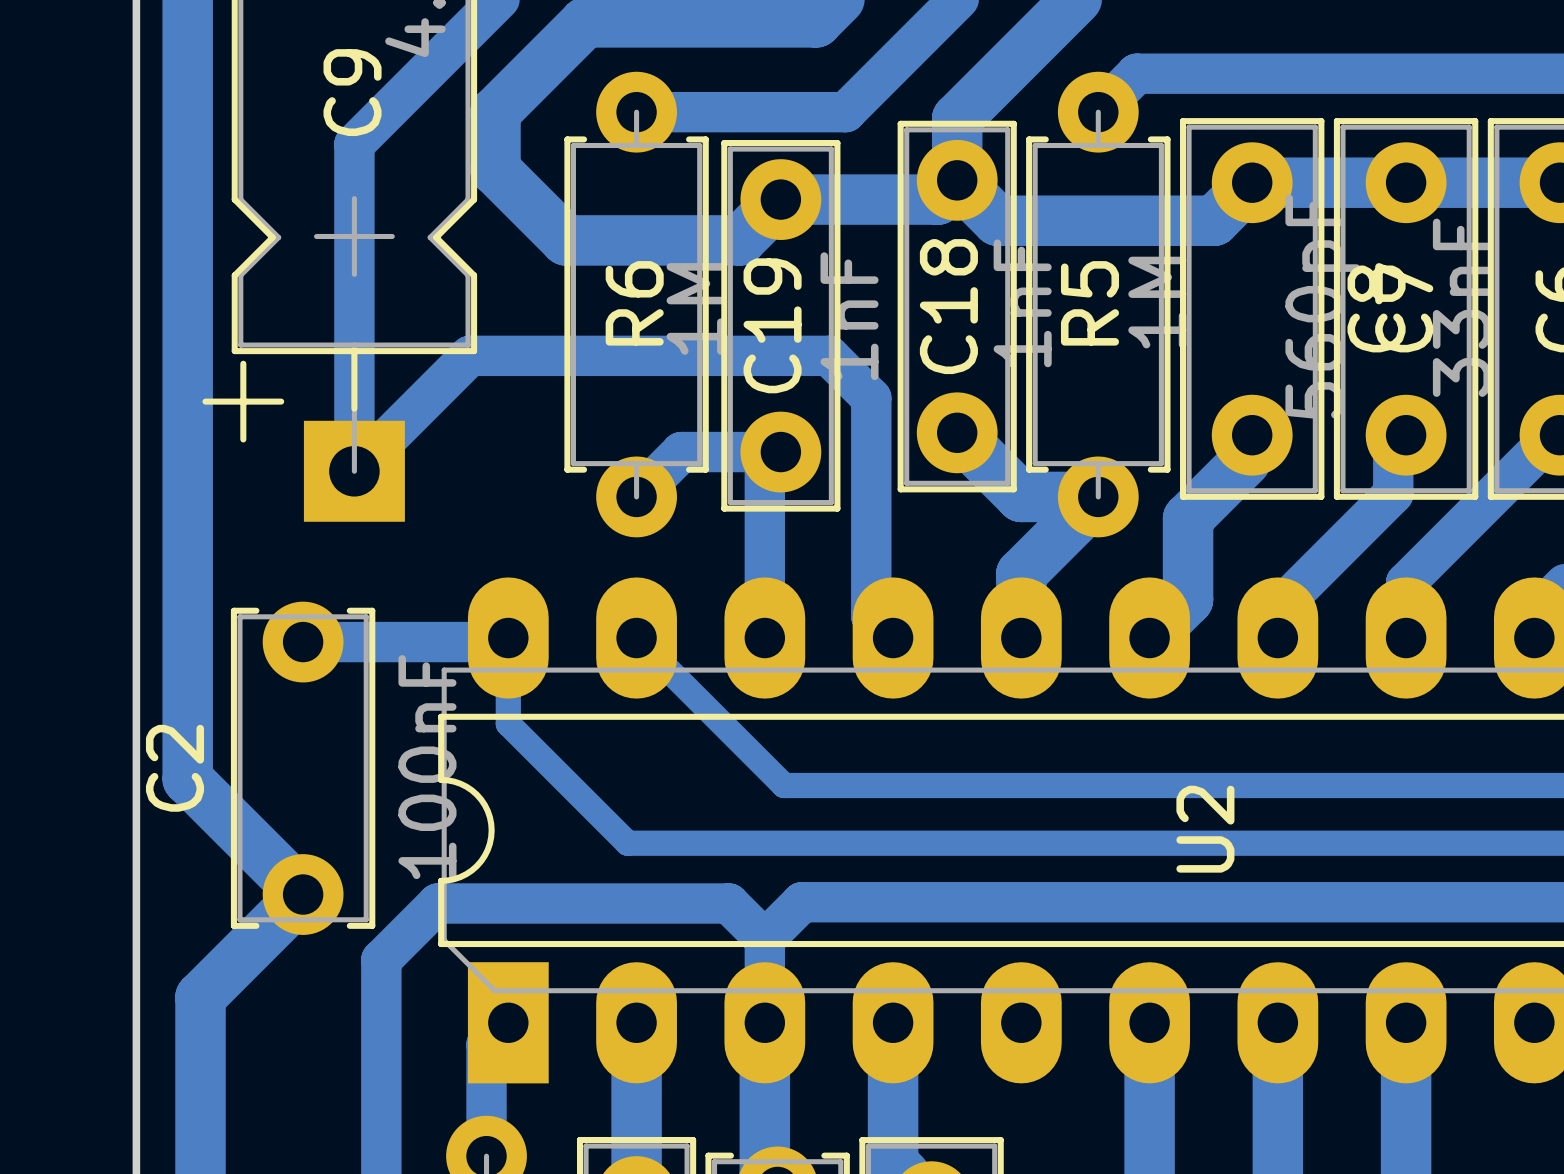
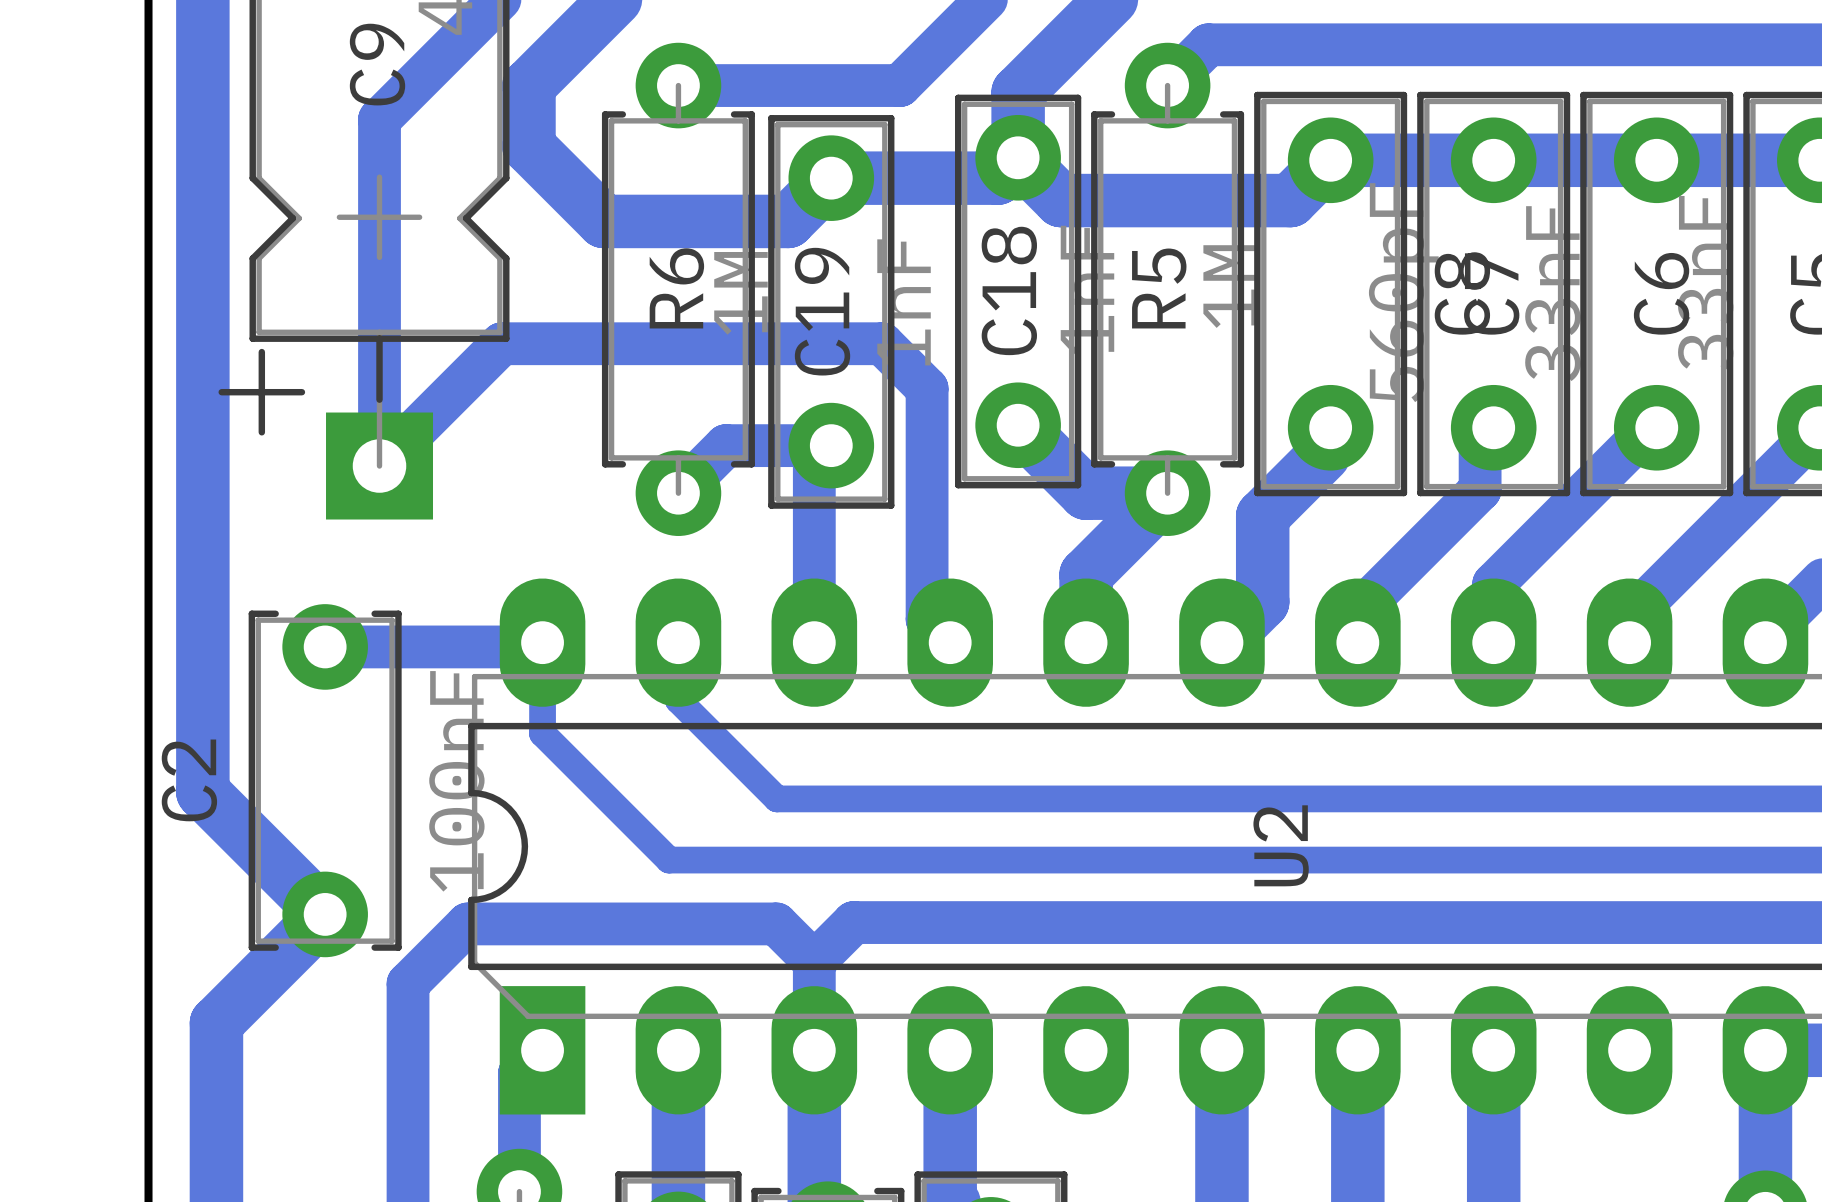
bottom track: (636, 638) (784, 785) -> (678, 642) (678, 700) (776, 798) (834, 798)

